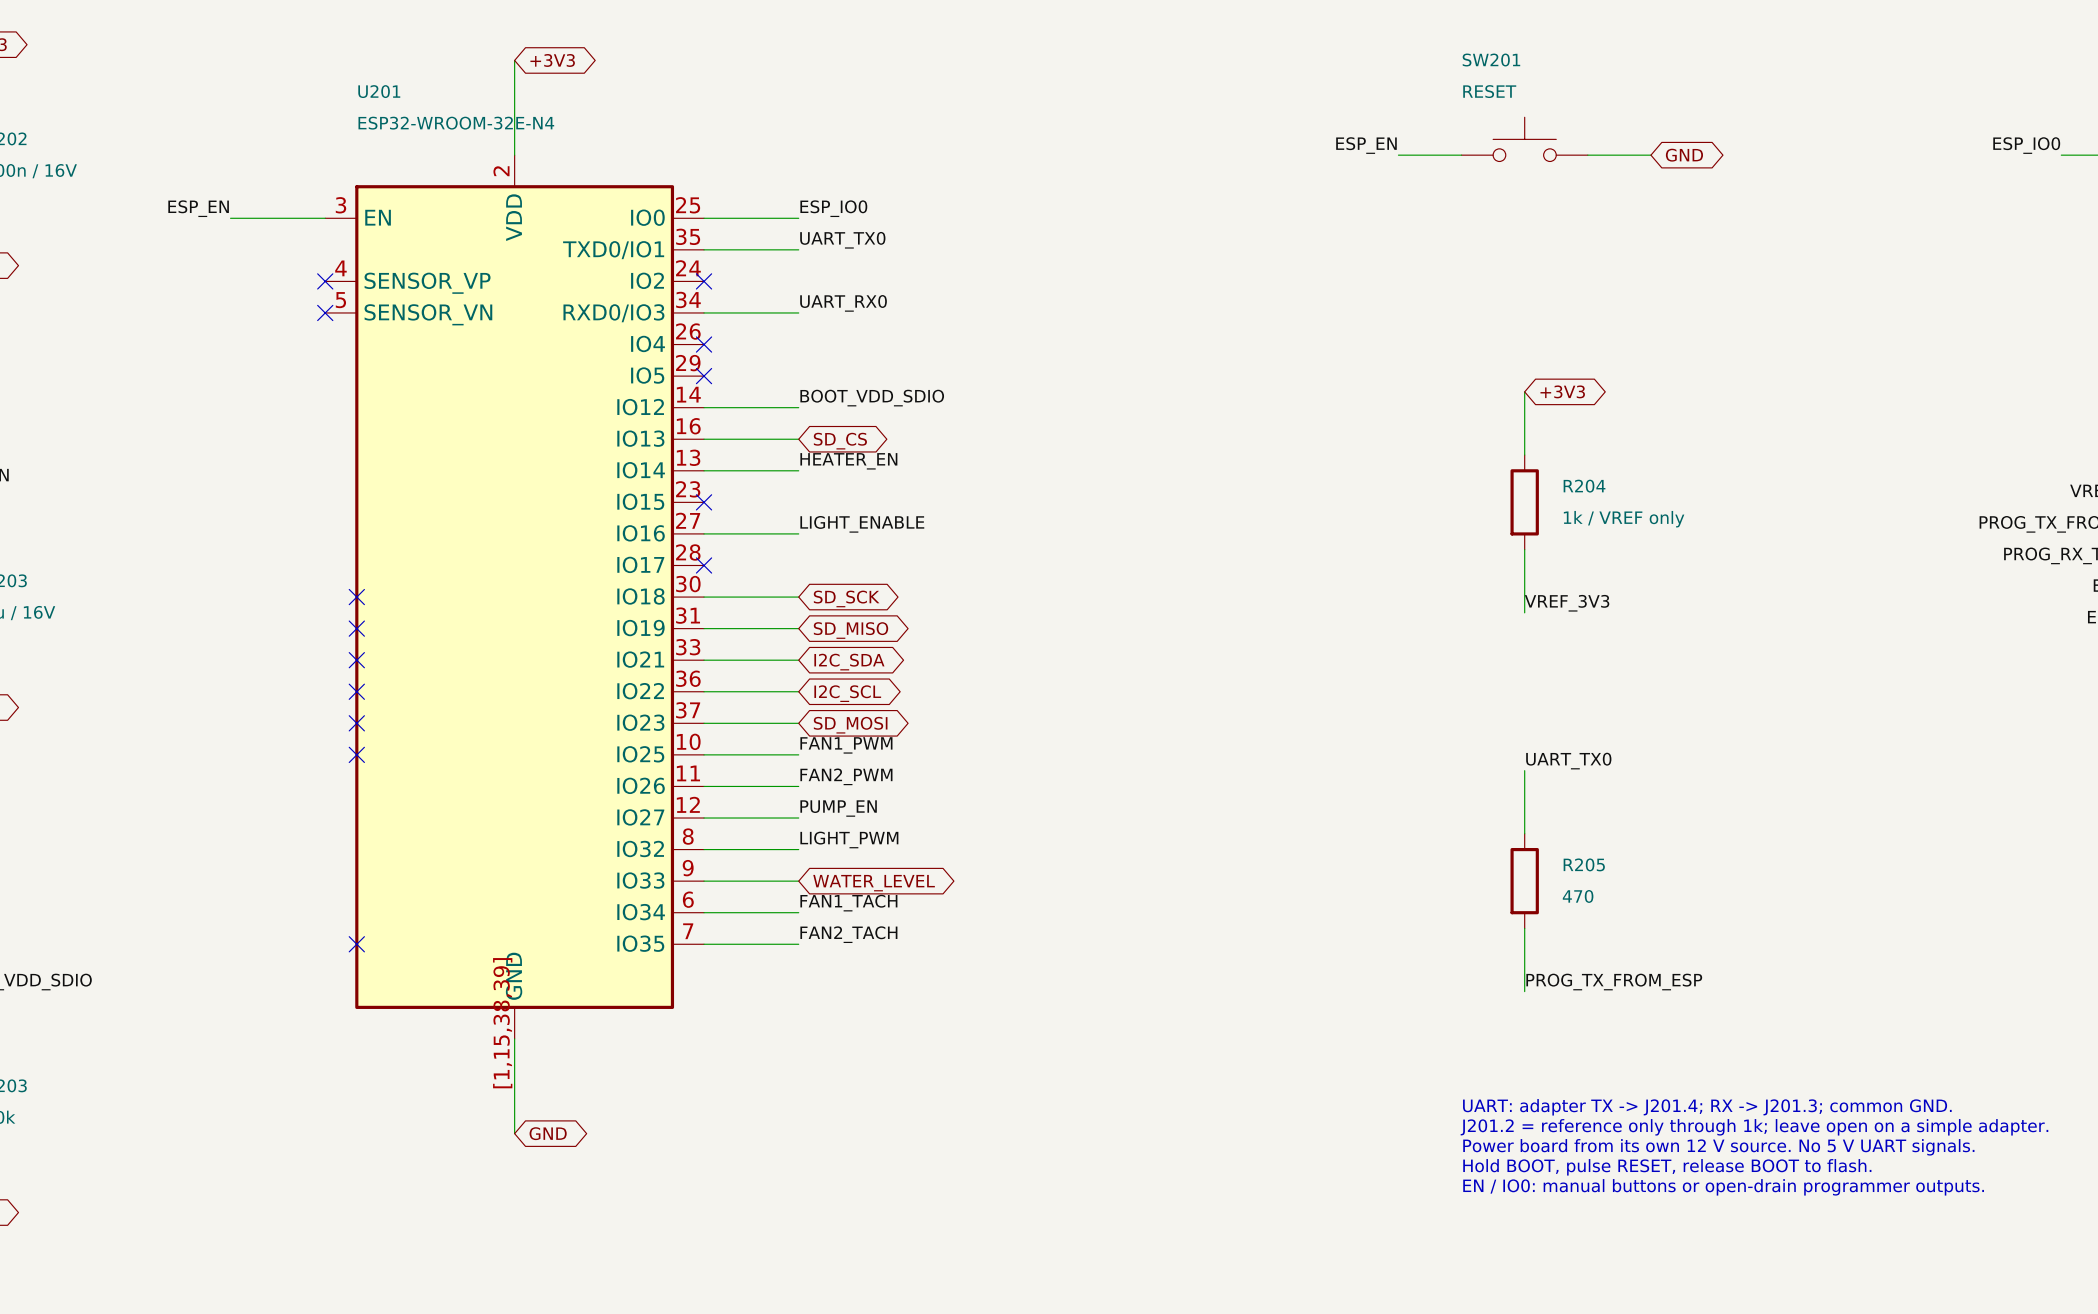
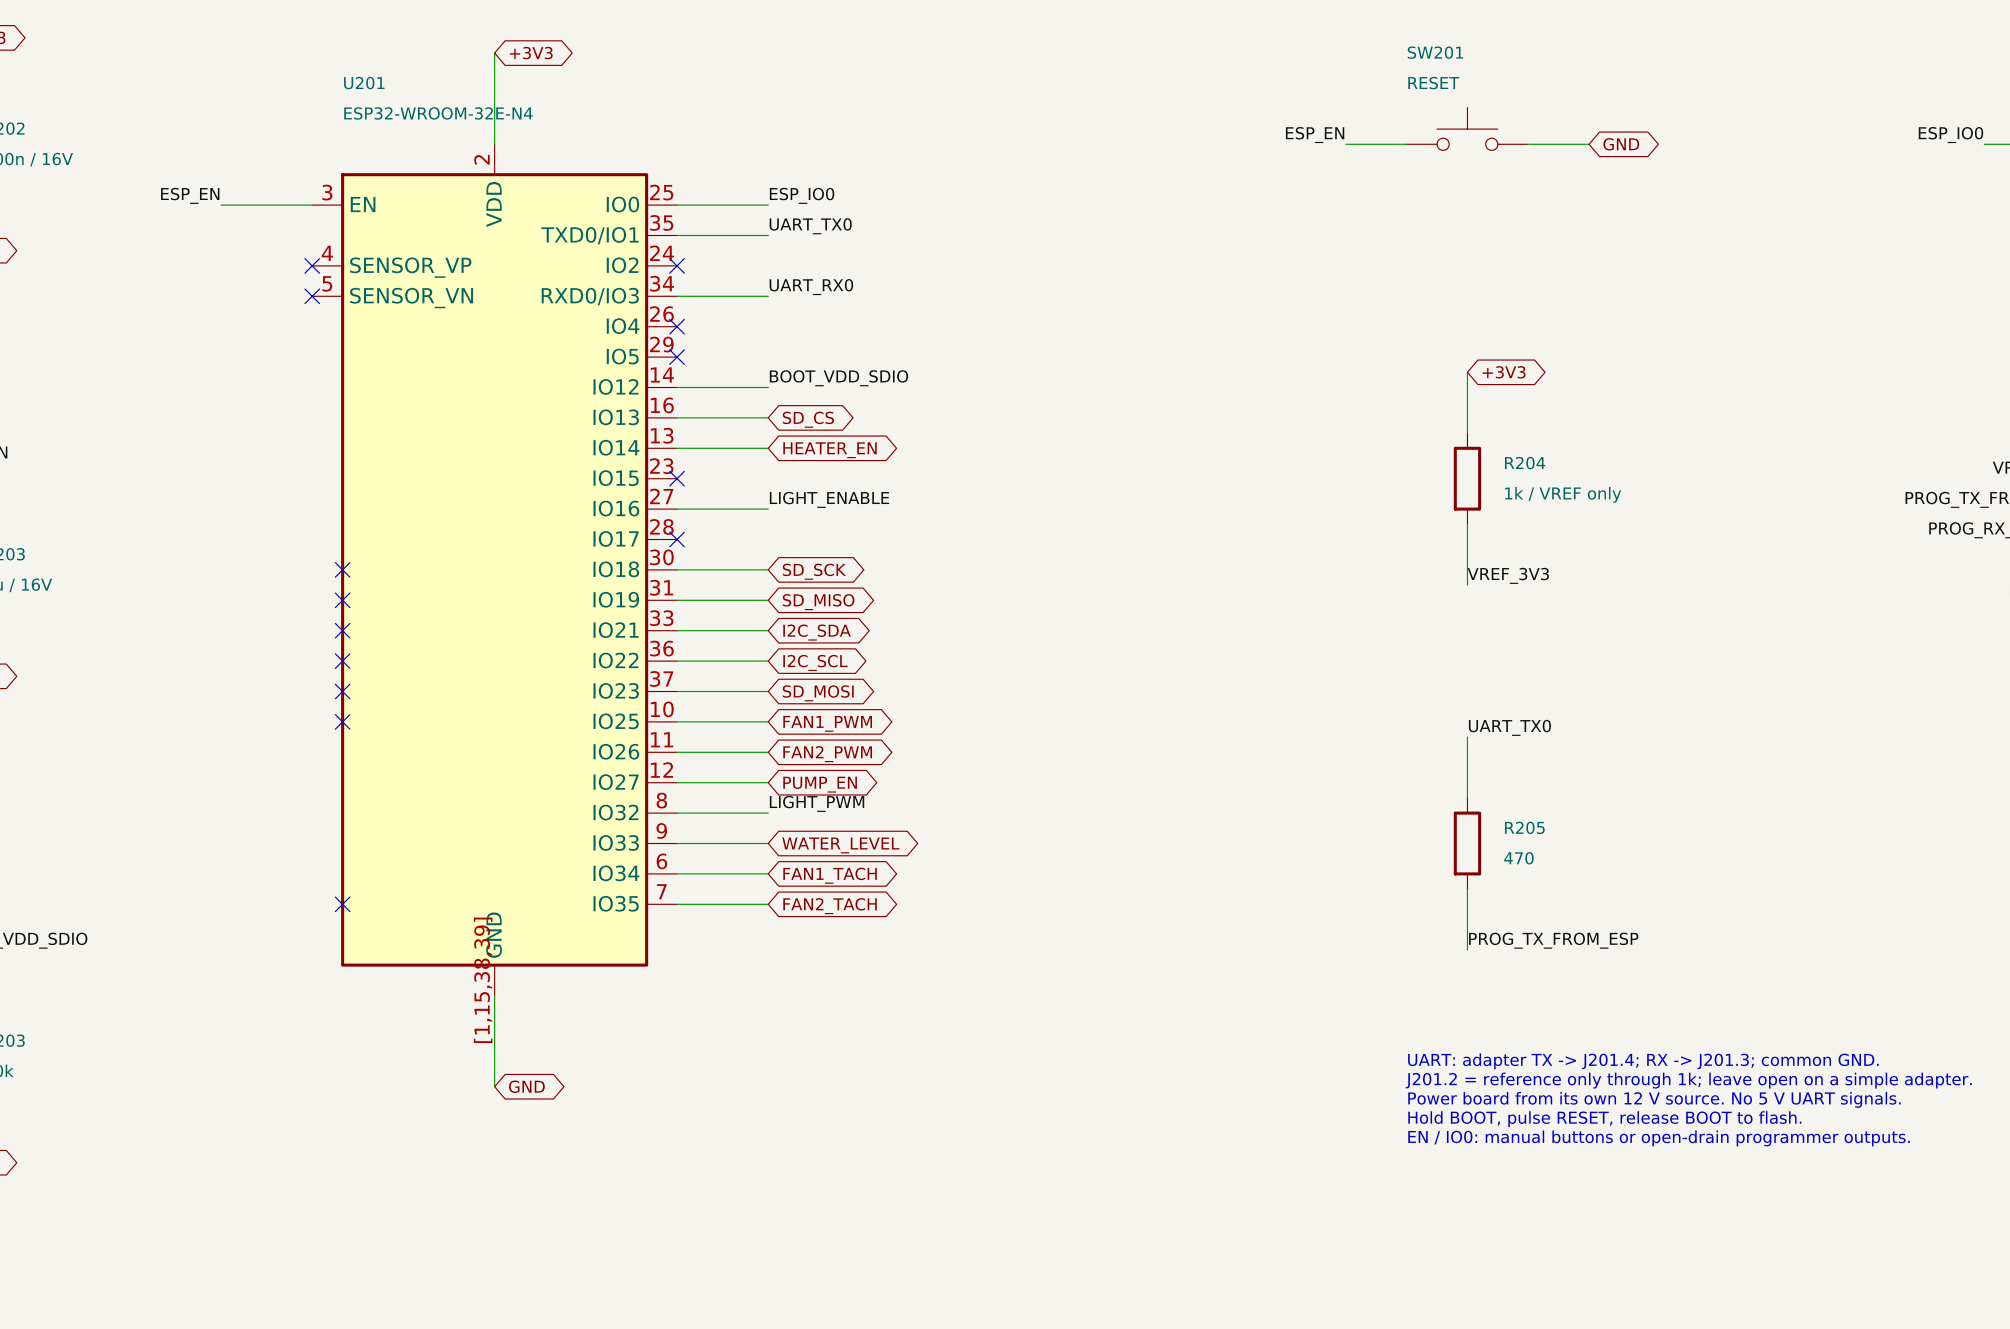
label: HEATER_EN (848, 461) -> none
global label: none -> HEATER_EN (830, 450)
label: FAN1_PWM (846, 745) -> none
global label: none -> FAN1_PWM (827, 723)
label: FAN2_PWM (846, 776) -> none
global label: none -> FAN2_PWM (827, 754)
label: PUMP_EN (838, 808) -> none
global label: none -> PUMP_EN (820, 784)
label: FAN1_TACH (848, 903) -> none
global label: none -> FAN1_TACH (830, 875)
label: FAN2_TACH (848, 934) -> none
global label: none -> FAN2_TACH (830, 906)

